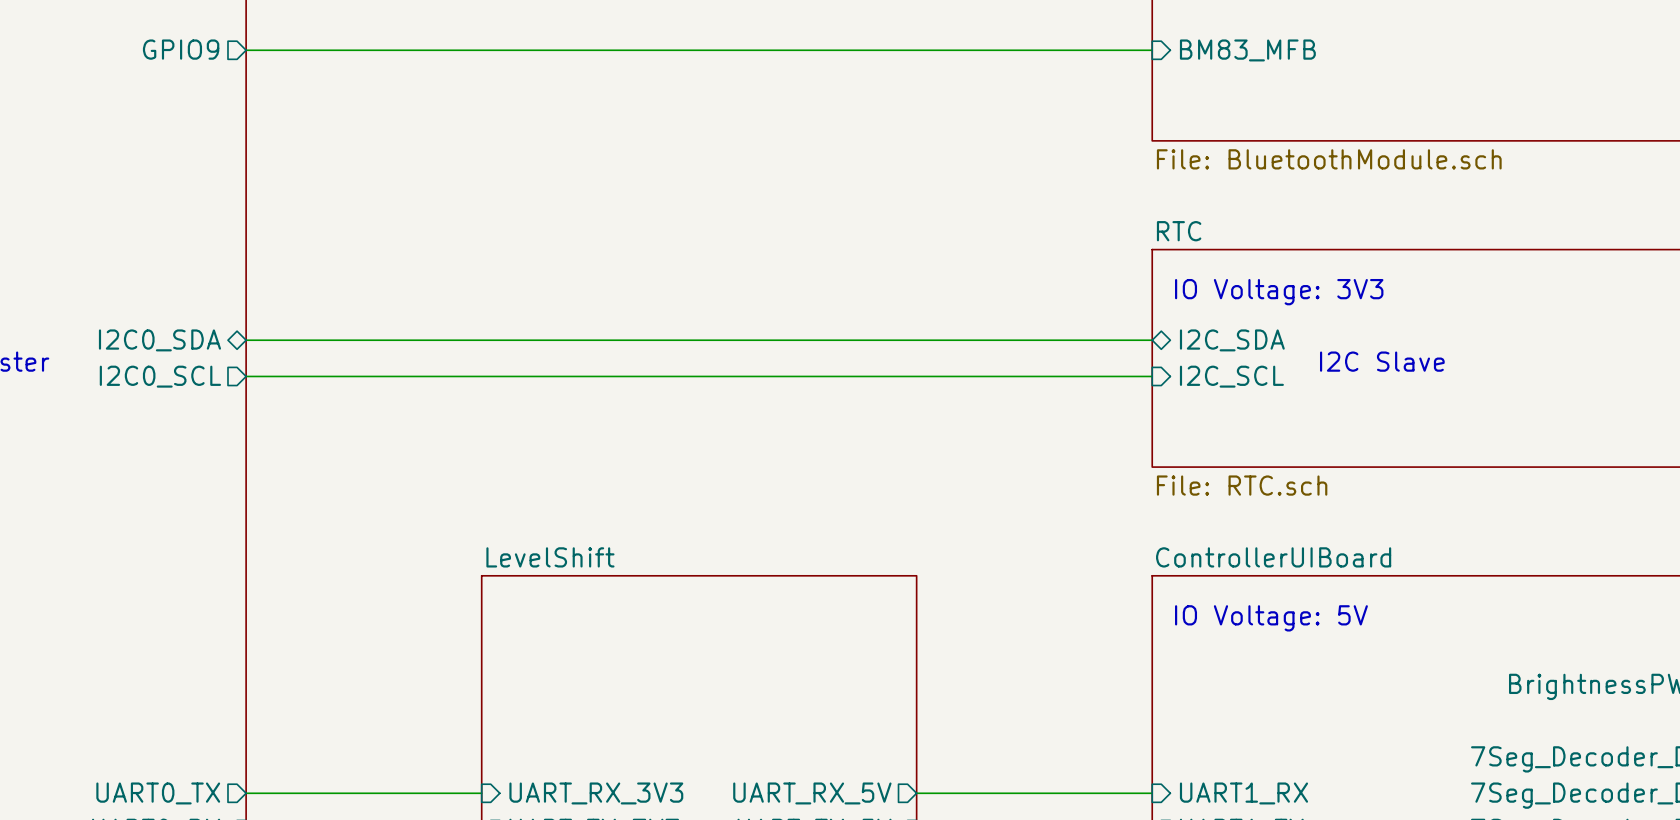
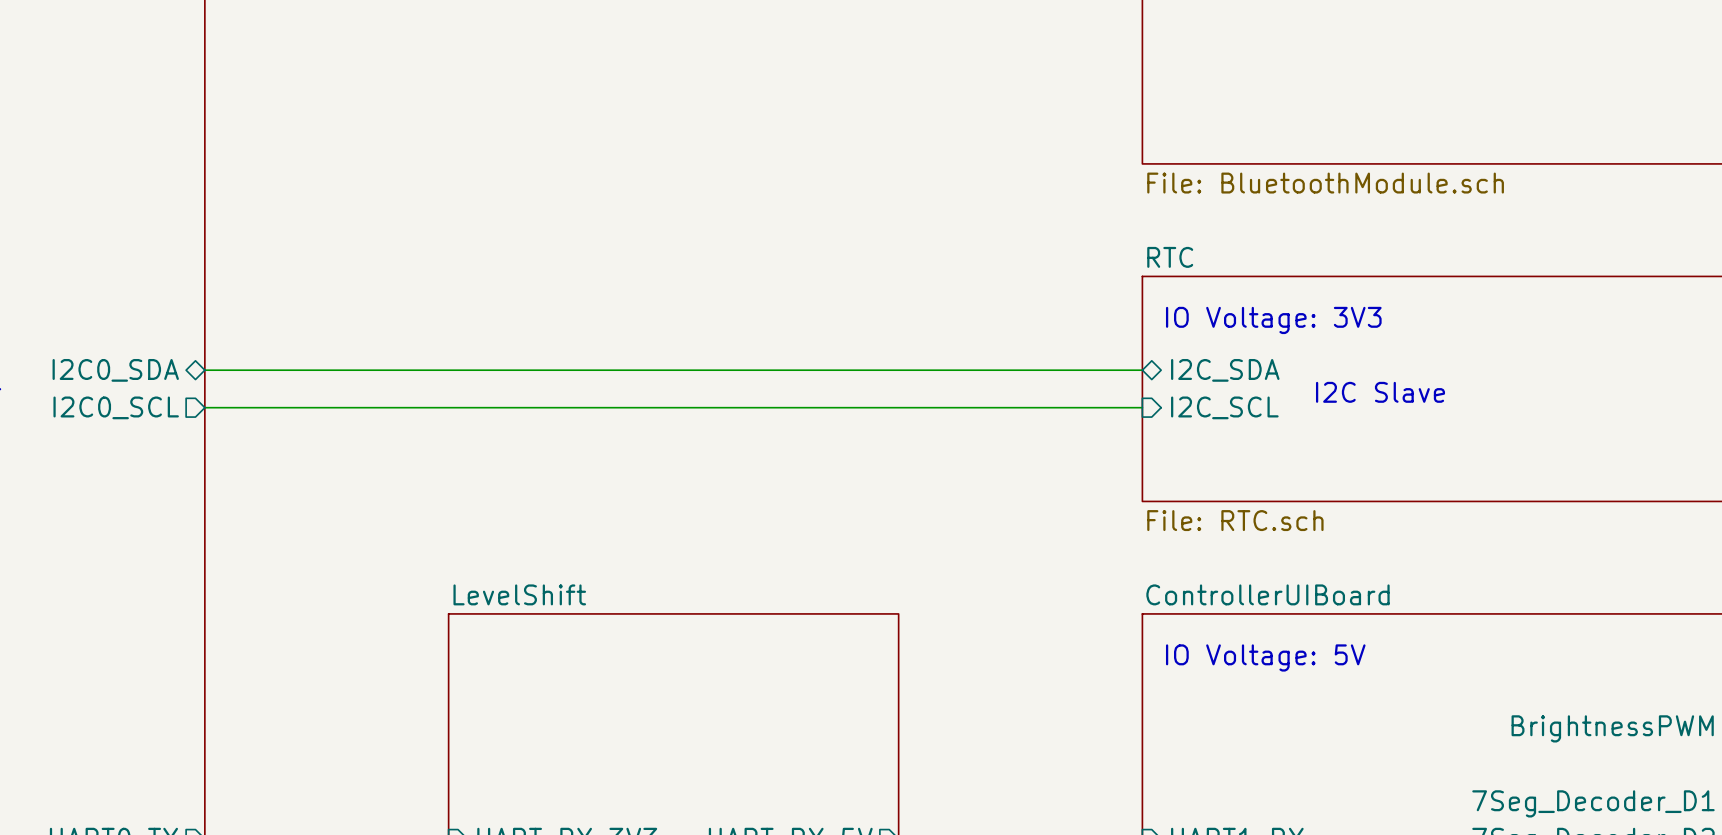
sheet pin: GPIO9 (181, 49) -> none
wire: (246, 50) (1152, 50) -> none
sheet pin: BM83_MFB (1247, 50) -> none

